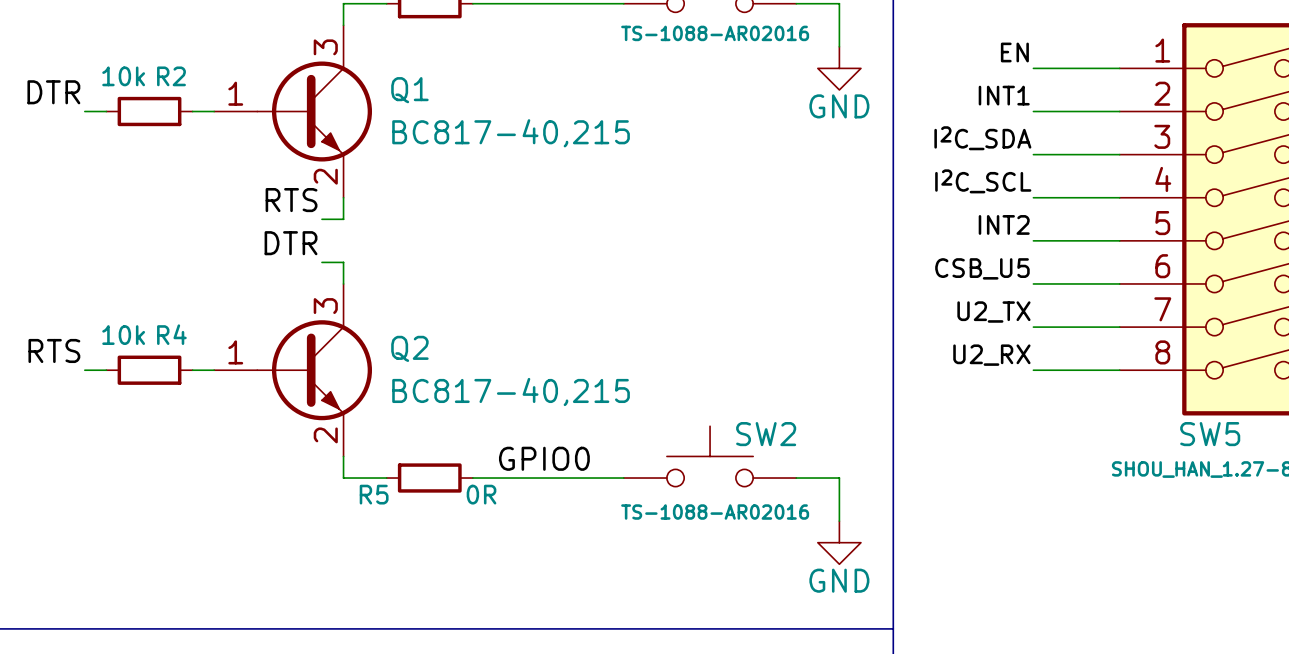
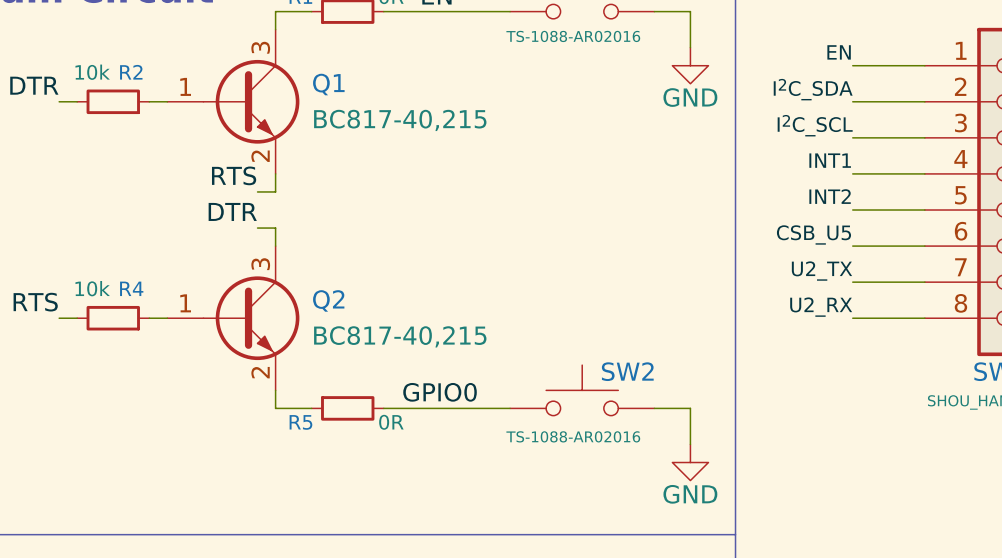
label: INT1 (1004, 95) -> I2C_SDA (813, 89)
label: I2C_SDA (982, 138) -> I2C_SCL (815, 125)
label: I2C_SCL (983, 181) -> INT1 (830, 160)

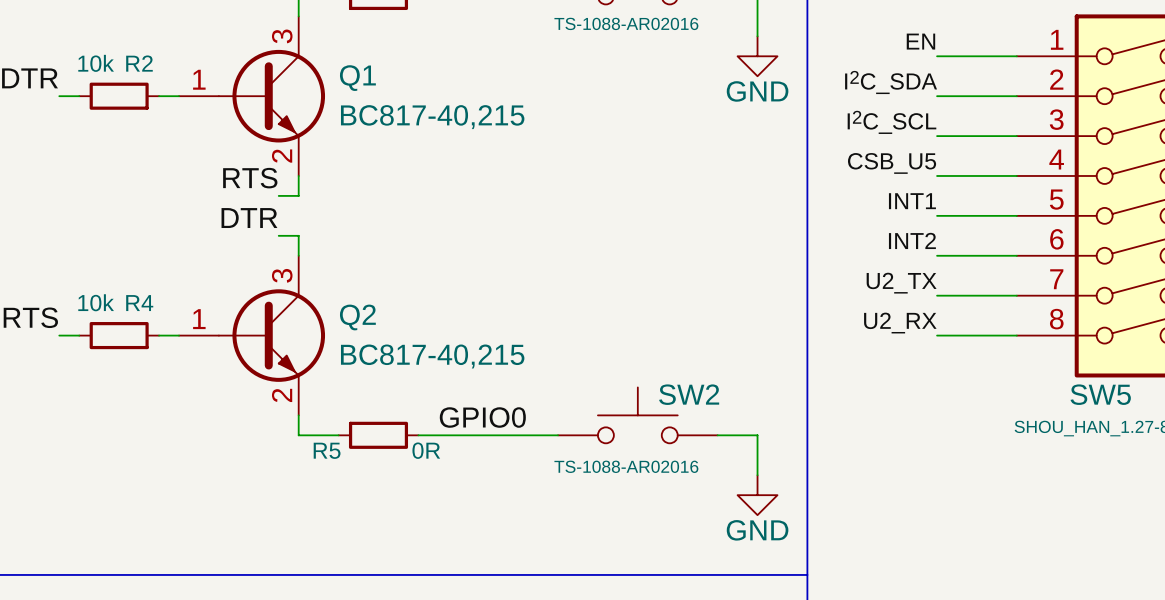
label: INT1 (830, 160) -> CSB_U5 (892, 163)
label: INT2 (830, 196) -> INT1 (912, 201)
label: CSB_U5 (813, 234) -> INT2 (912, 240)

